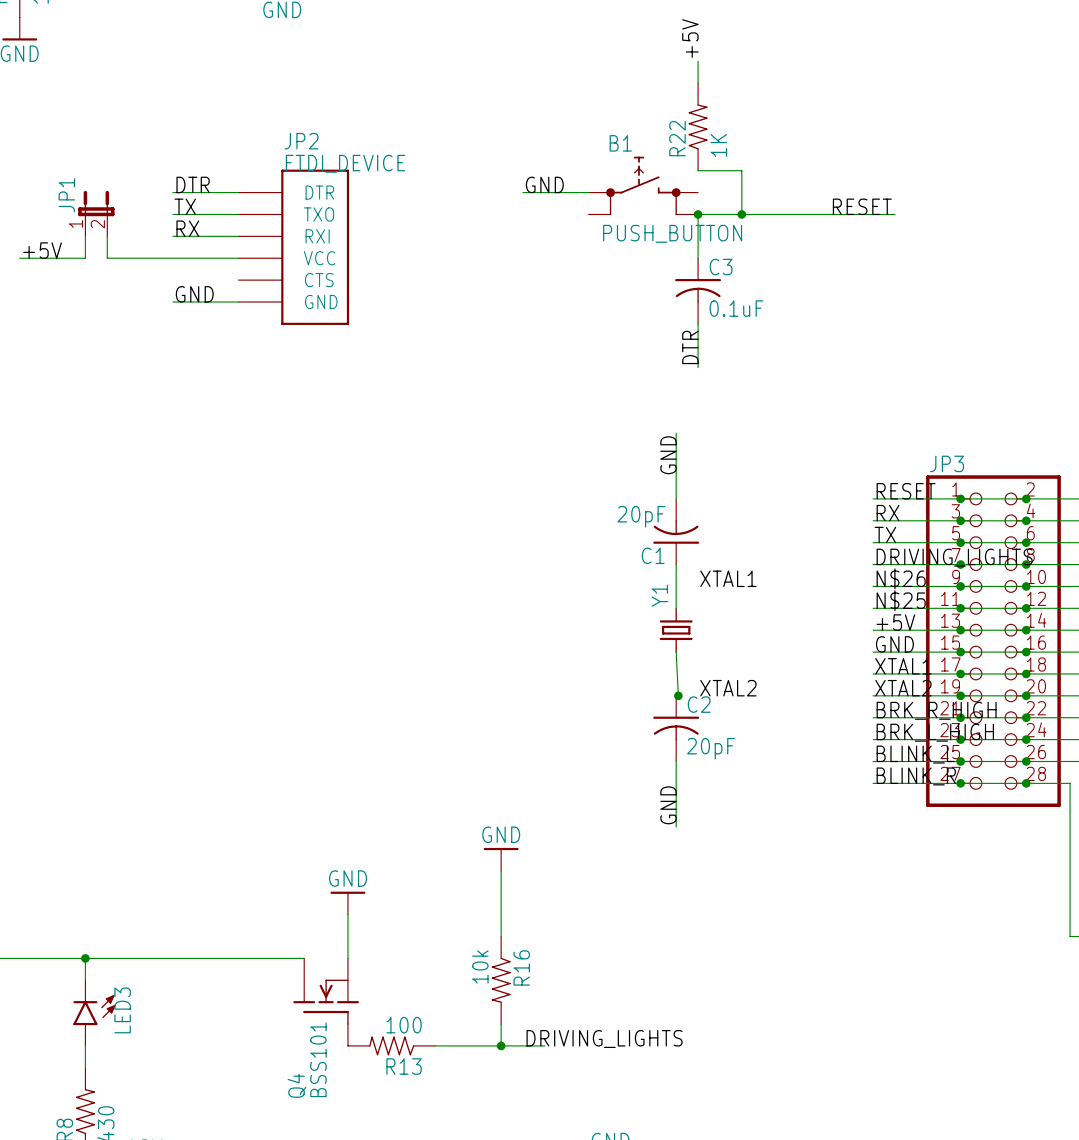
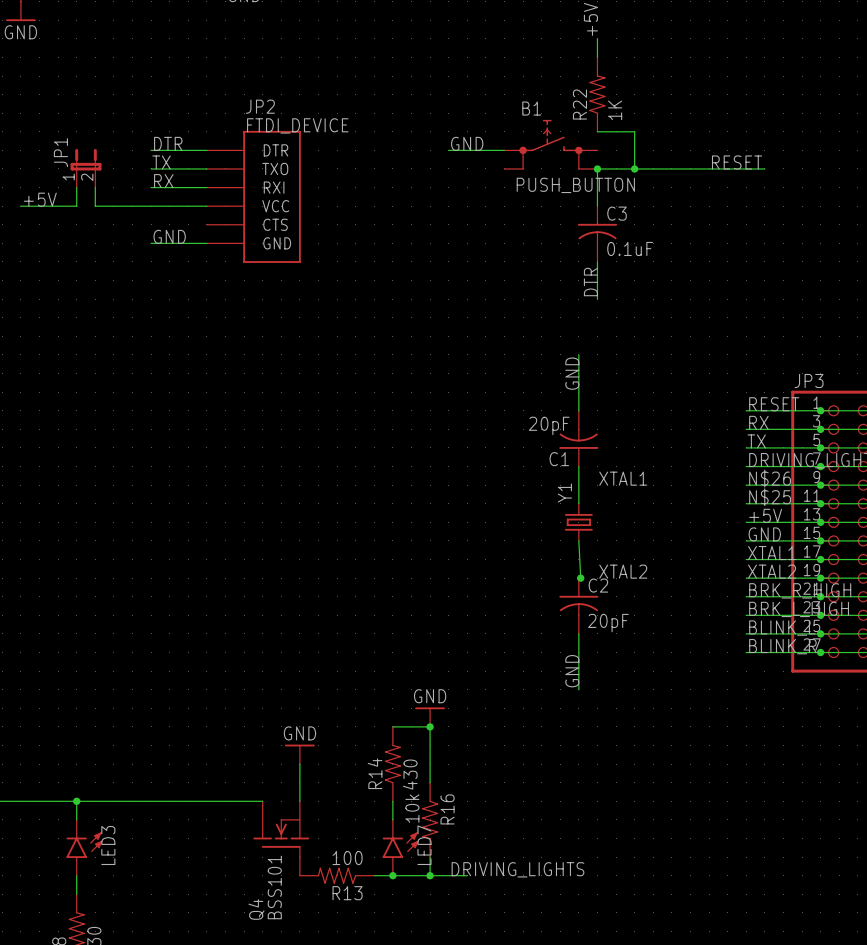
wire: none -> (392, 726) (430, 726)
junction: none -> (430, 726)
R14: none -> 430 (392, 764)
wire: none -> (392, 801) (392, 819)
LED7: none -> (400, 847)
junction: none -> (392, 875)

